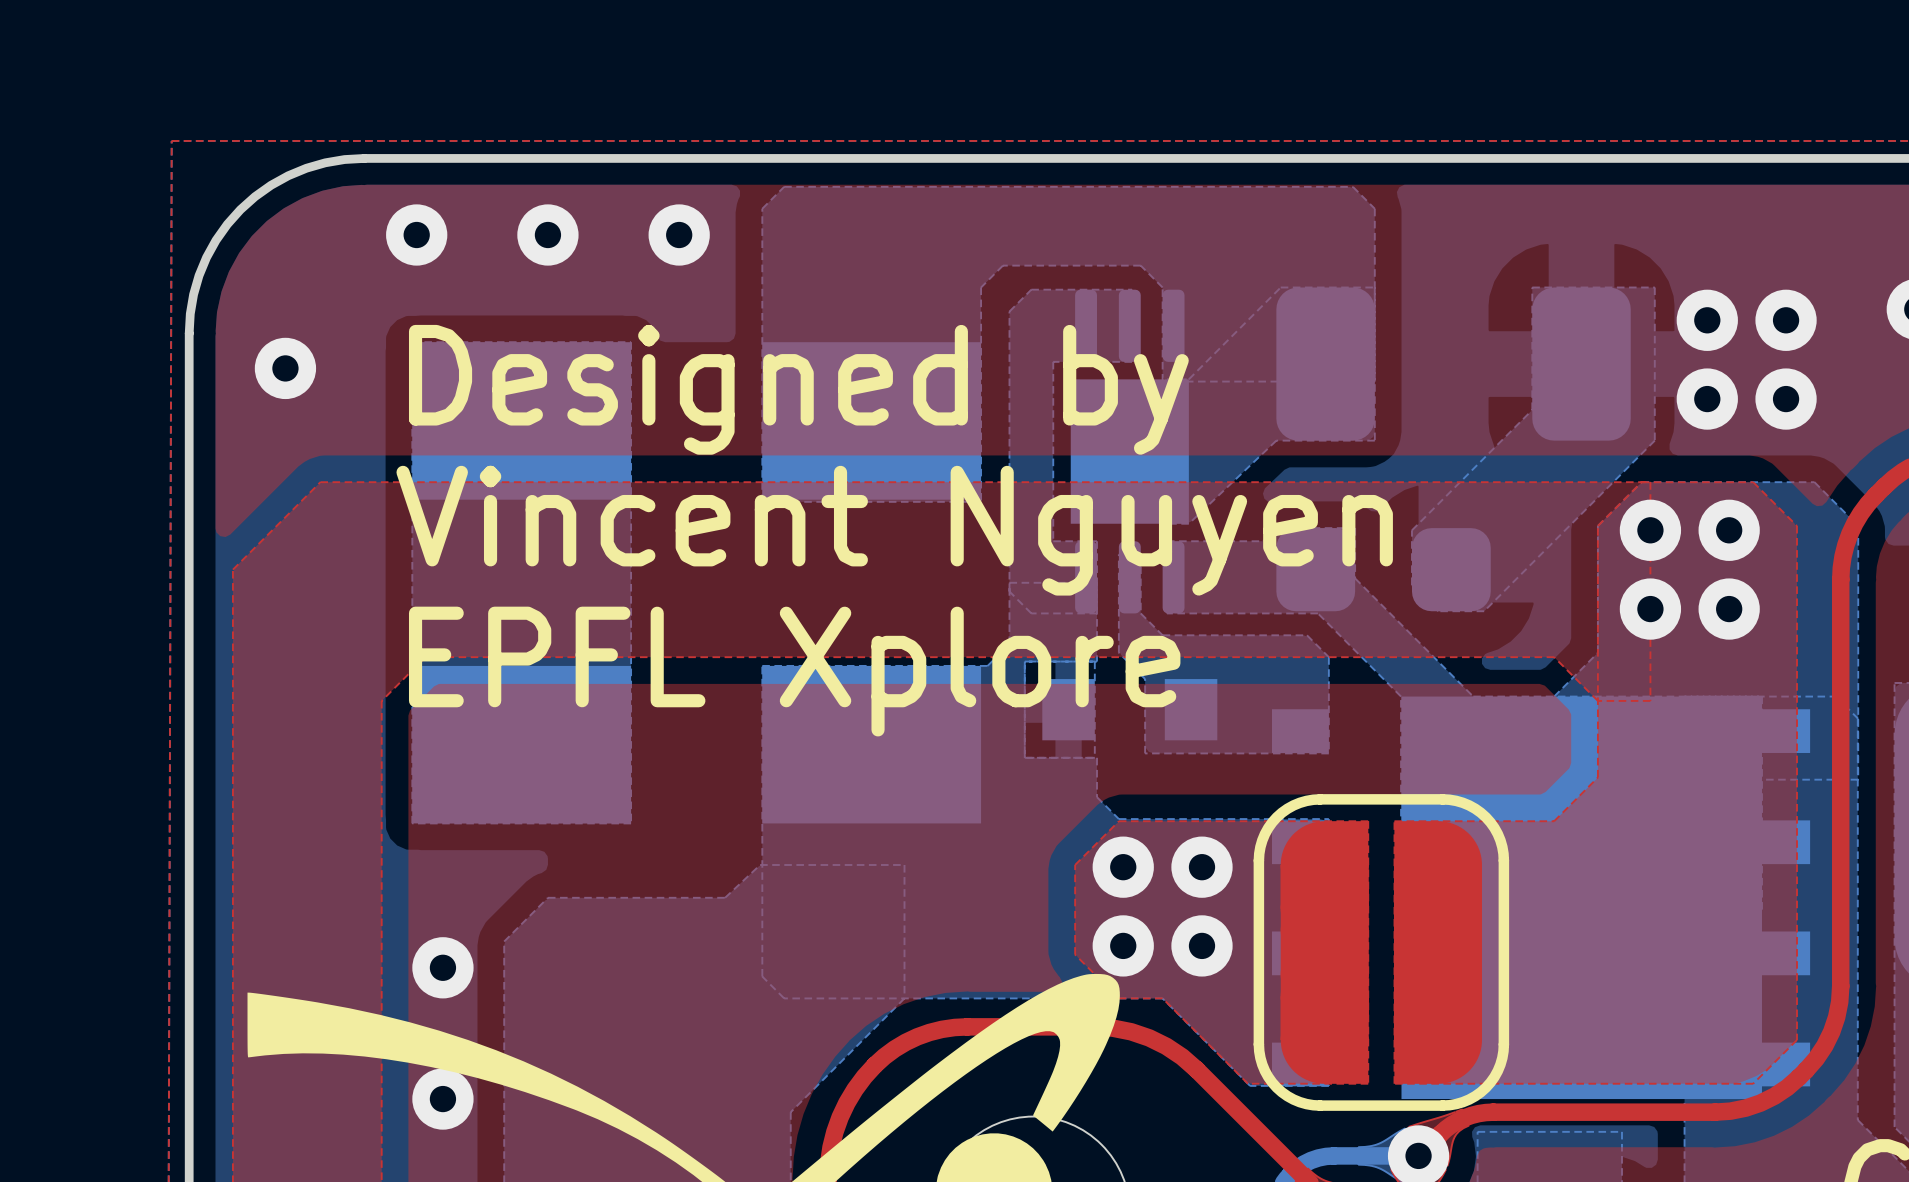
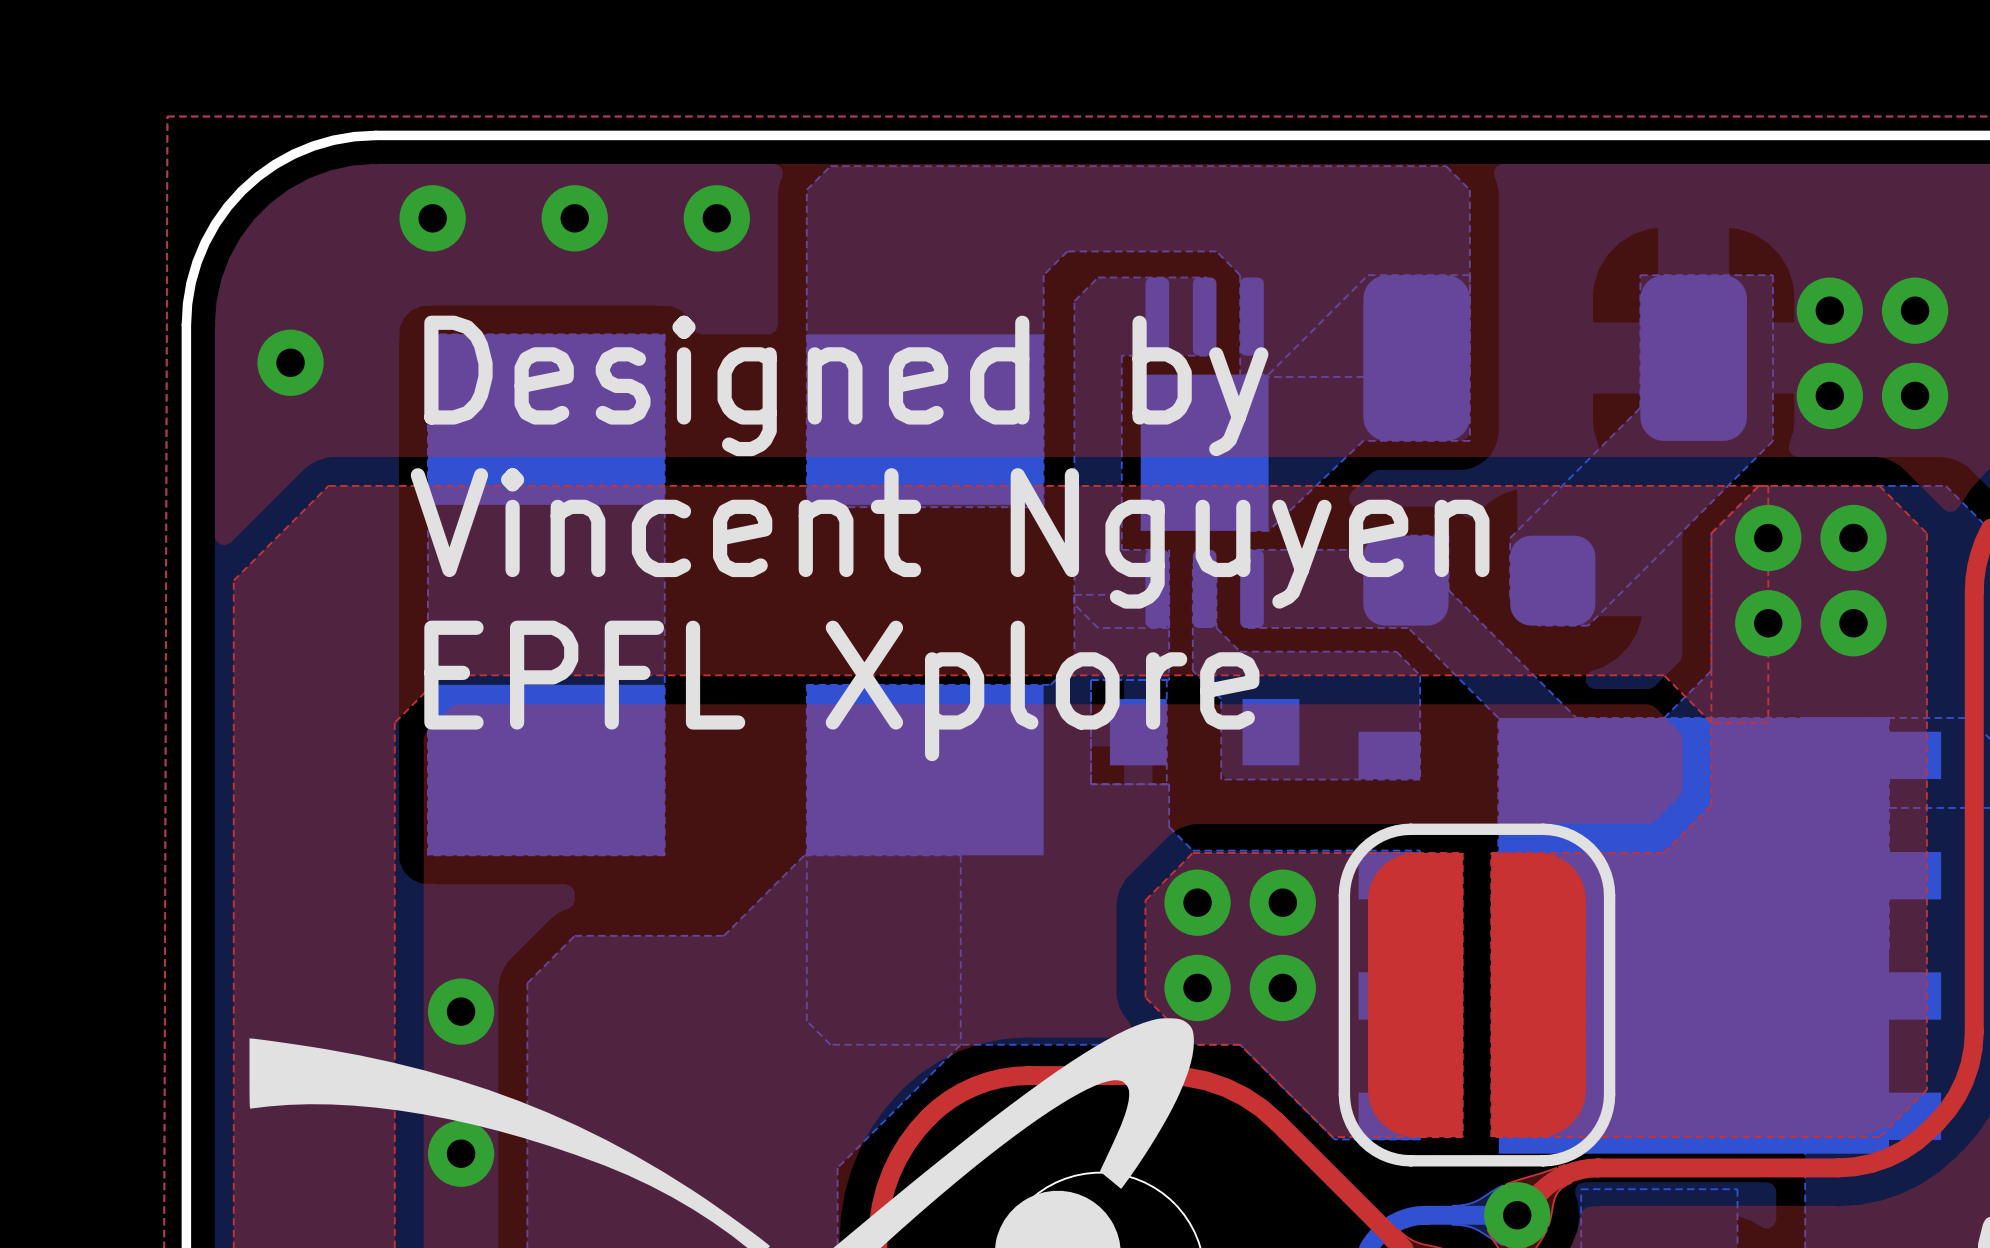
bottom zone outline: (904, 864) (760, 864) (725, 897) (685, 897) -> (960, 900) (960, 855) (804, 855) (723, 935)

